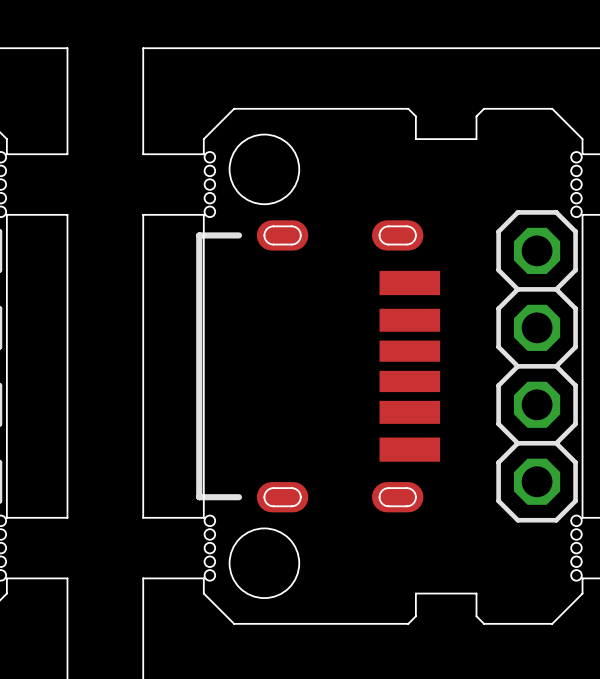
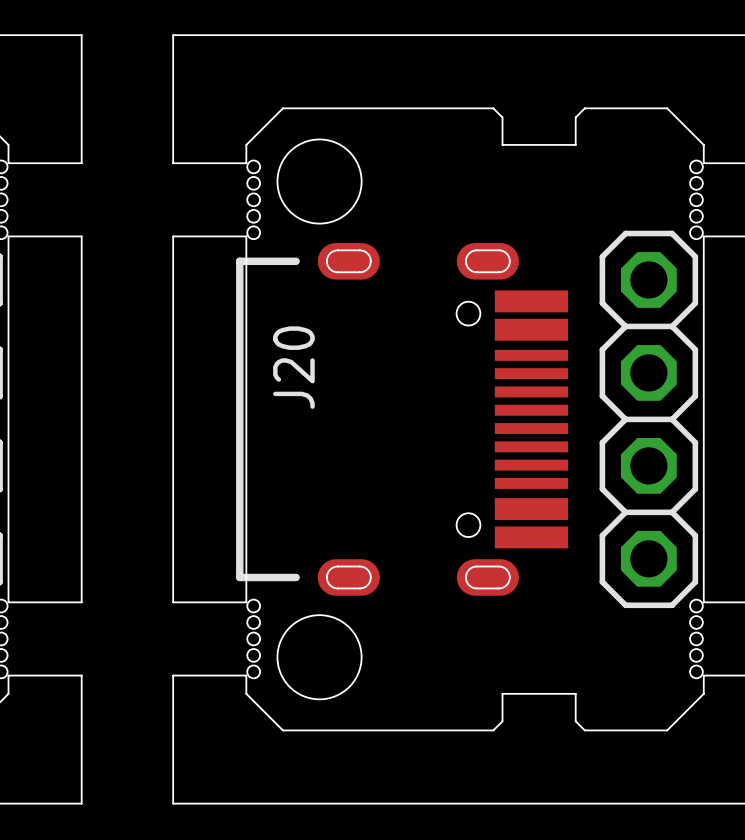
part: (318, 366) -> none
J20: none -> (402, 419)

